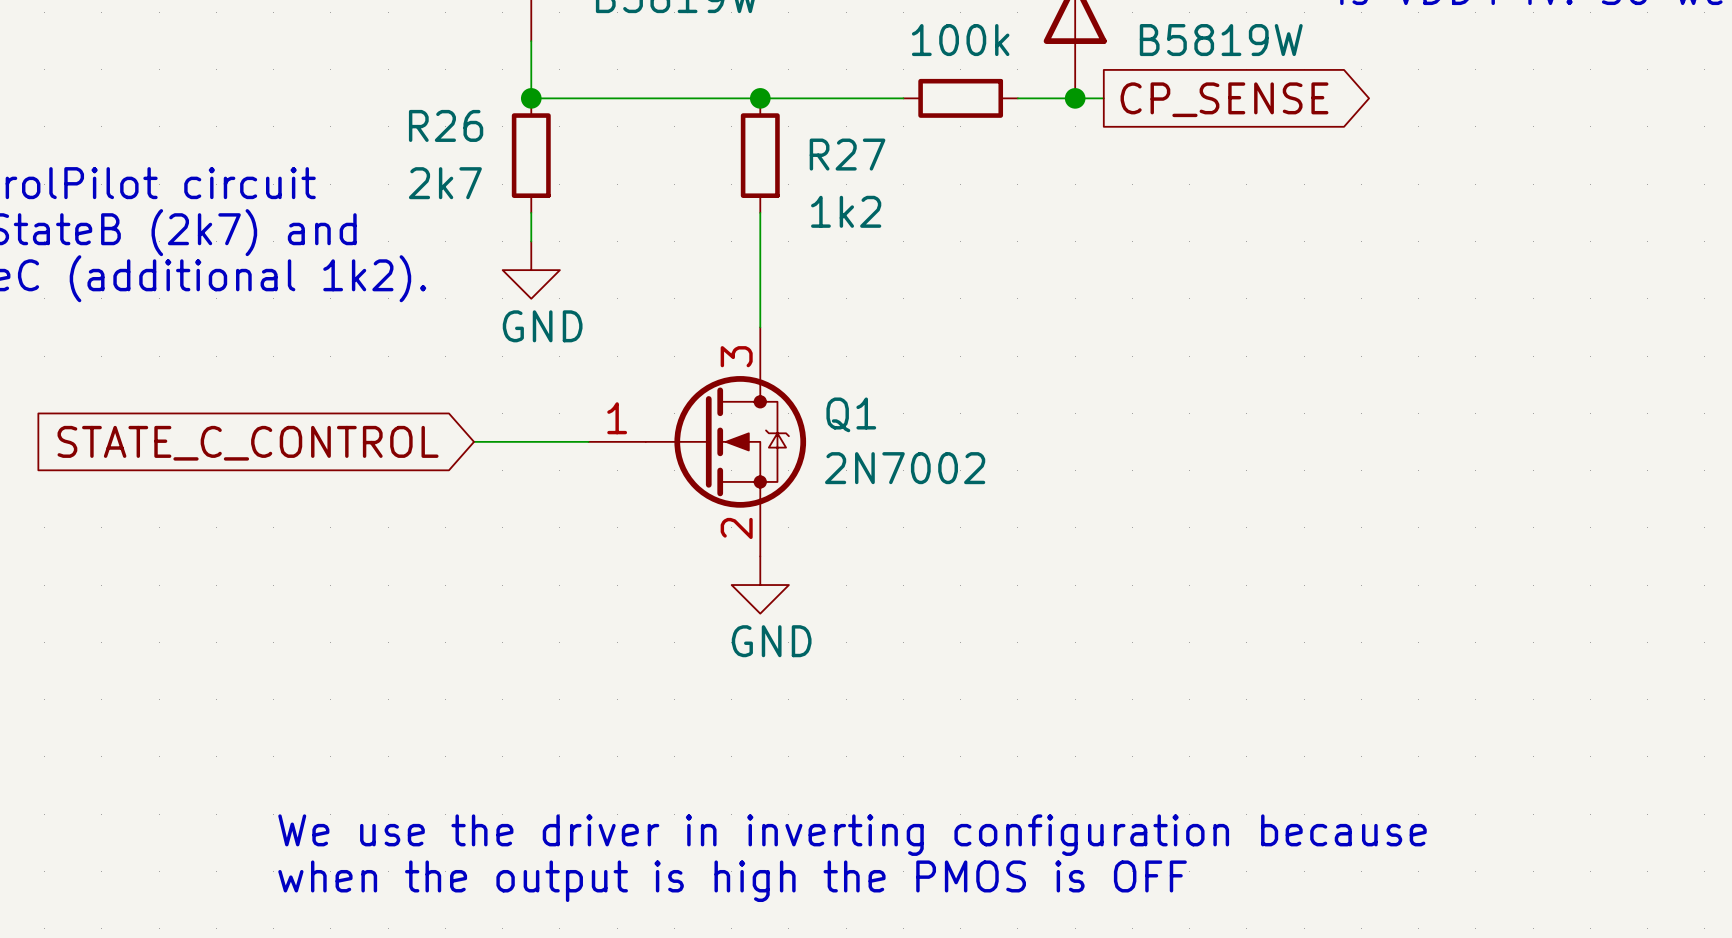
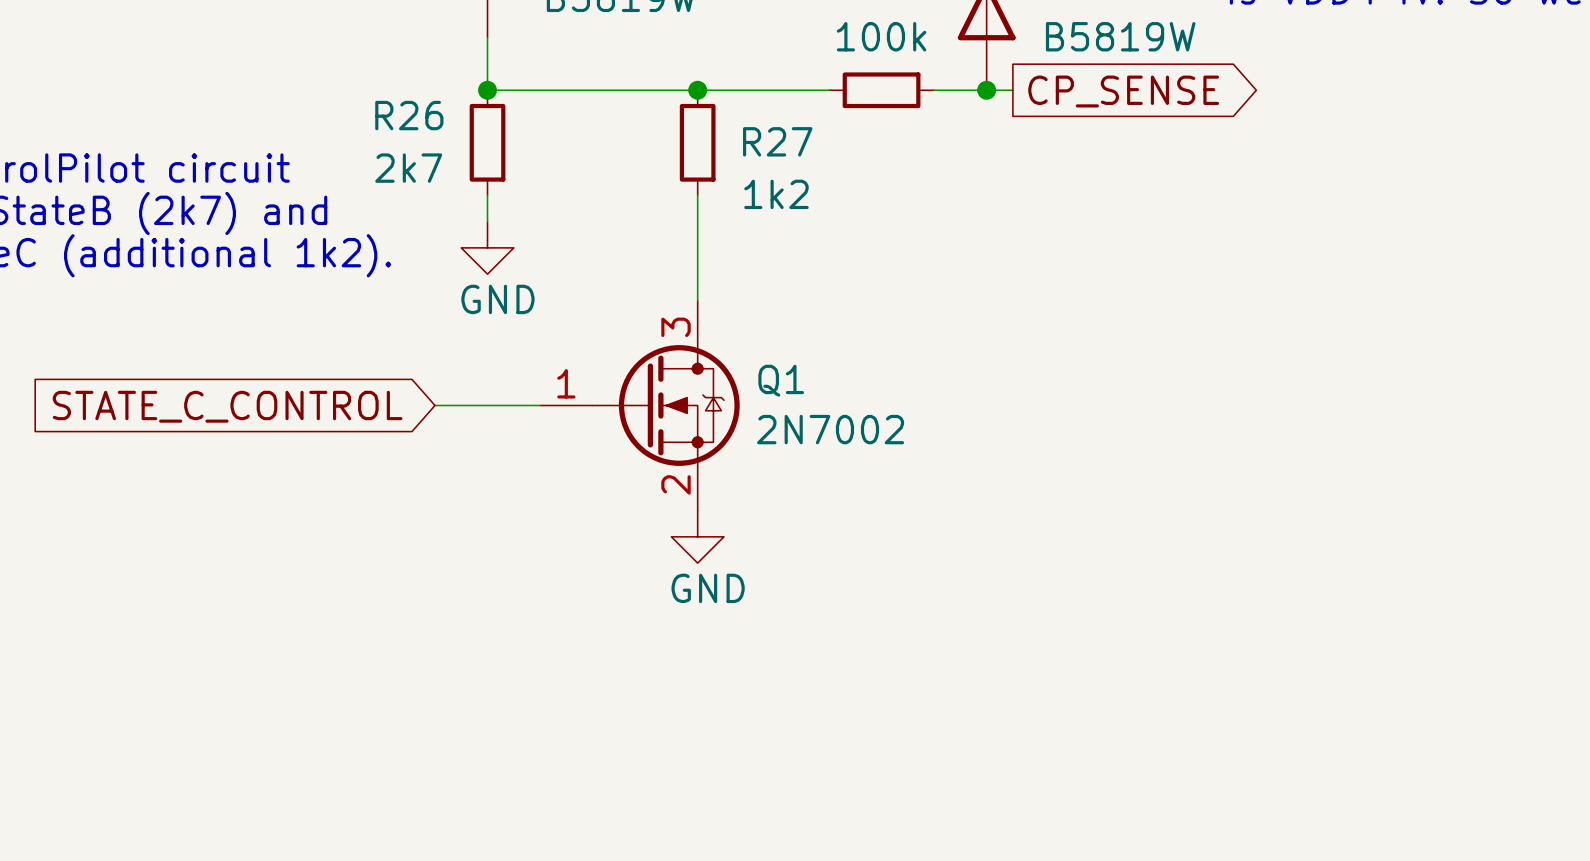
text: We use the driver in inverting configuration because (852, 835) -> none
text: when the output is high the PMOS is OFF (732, 881) -> none

